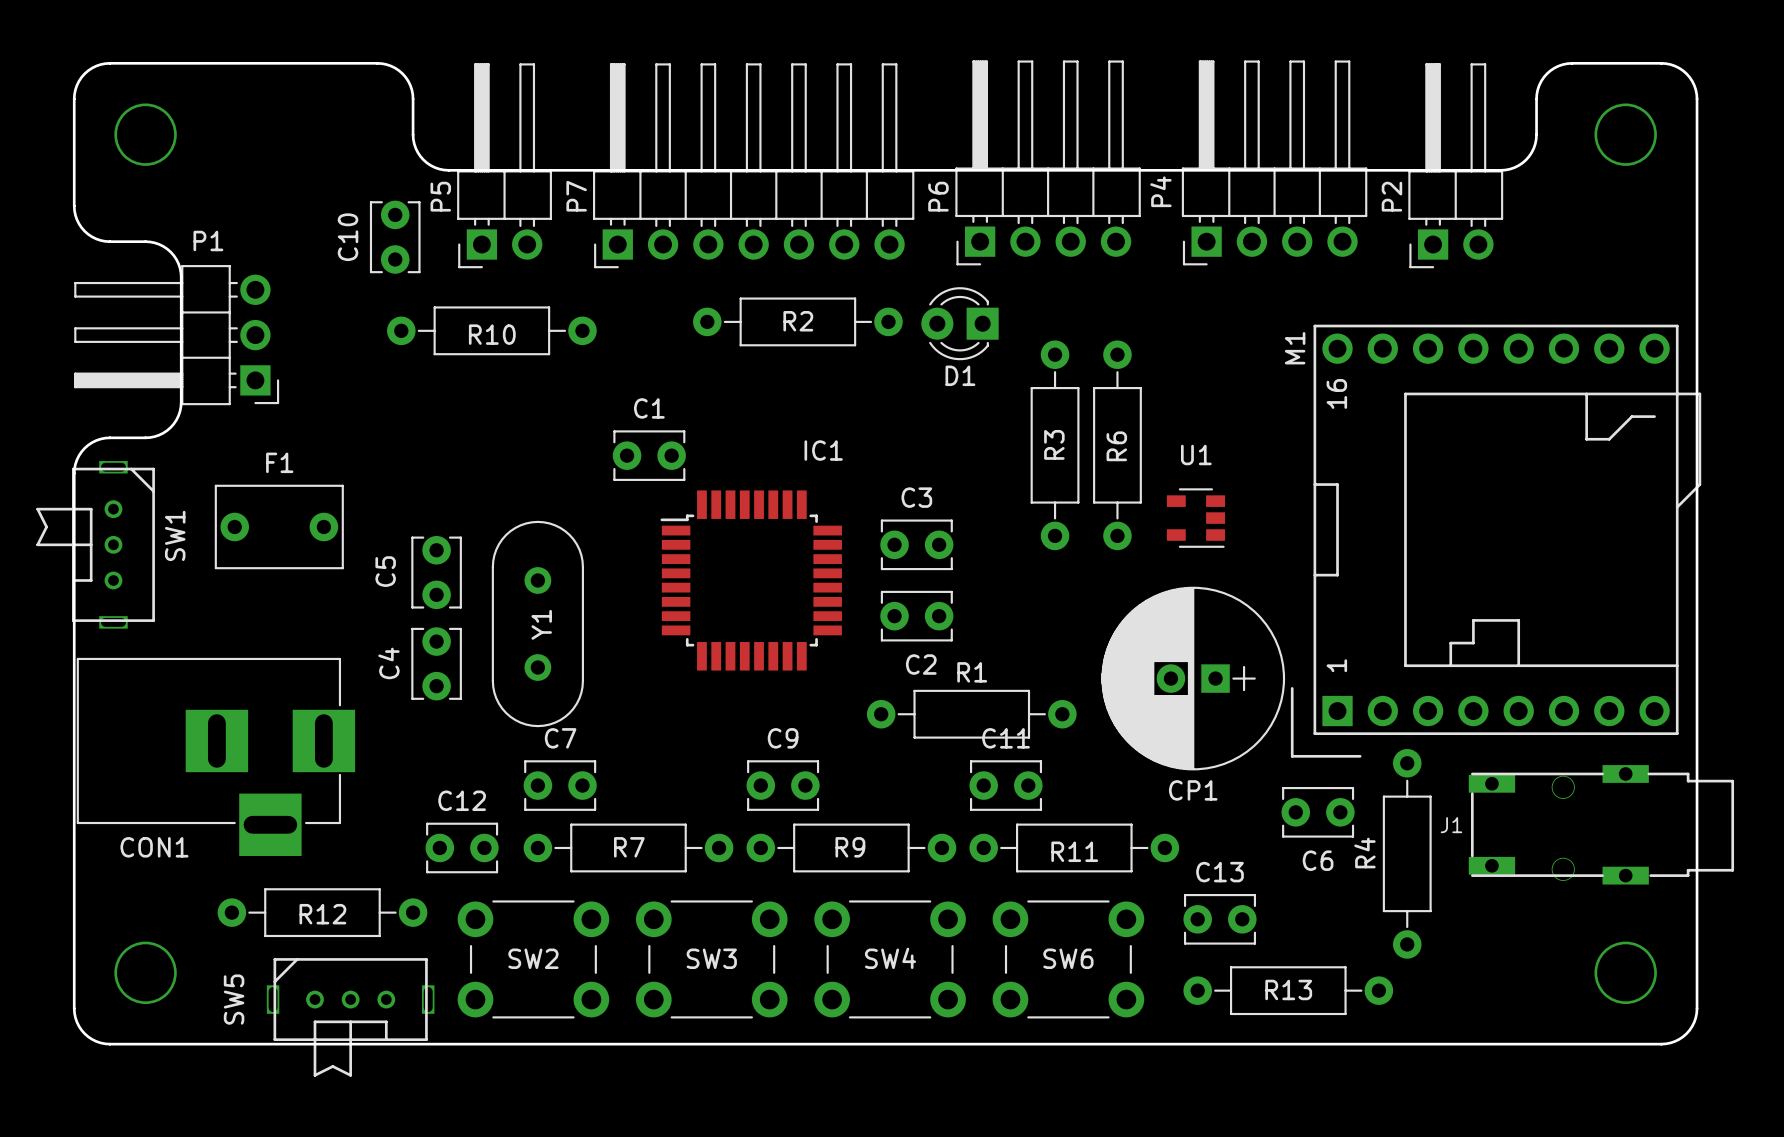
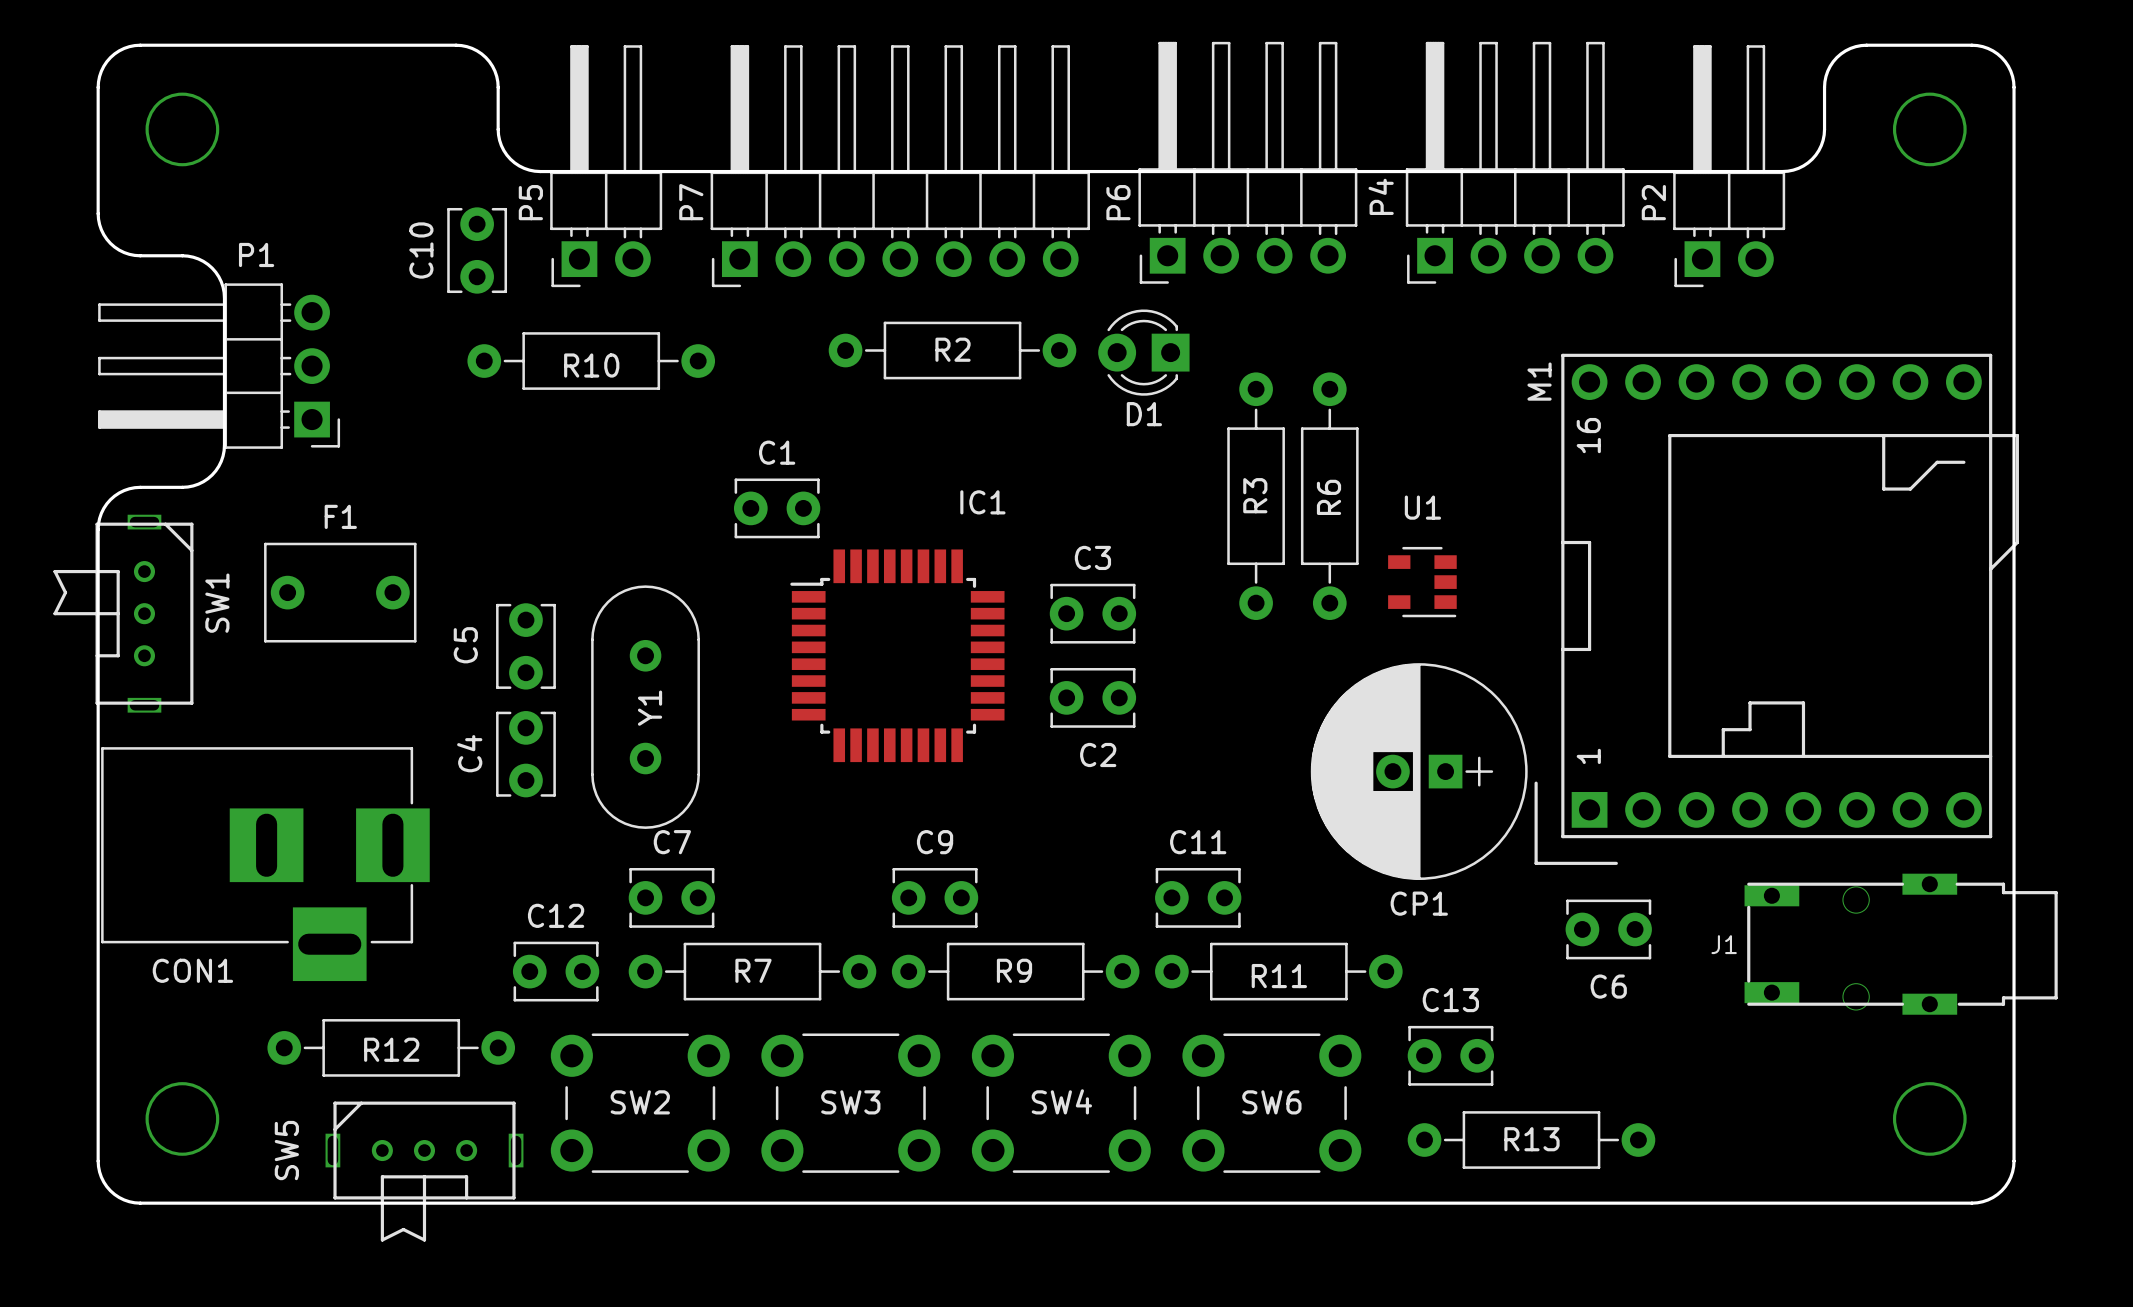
R1: (971, 714) -> none
C6 position: (1318, 812) -> (1608, 929)
R4: (1407, 853) -> none

